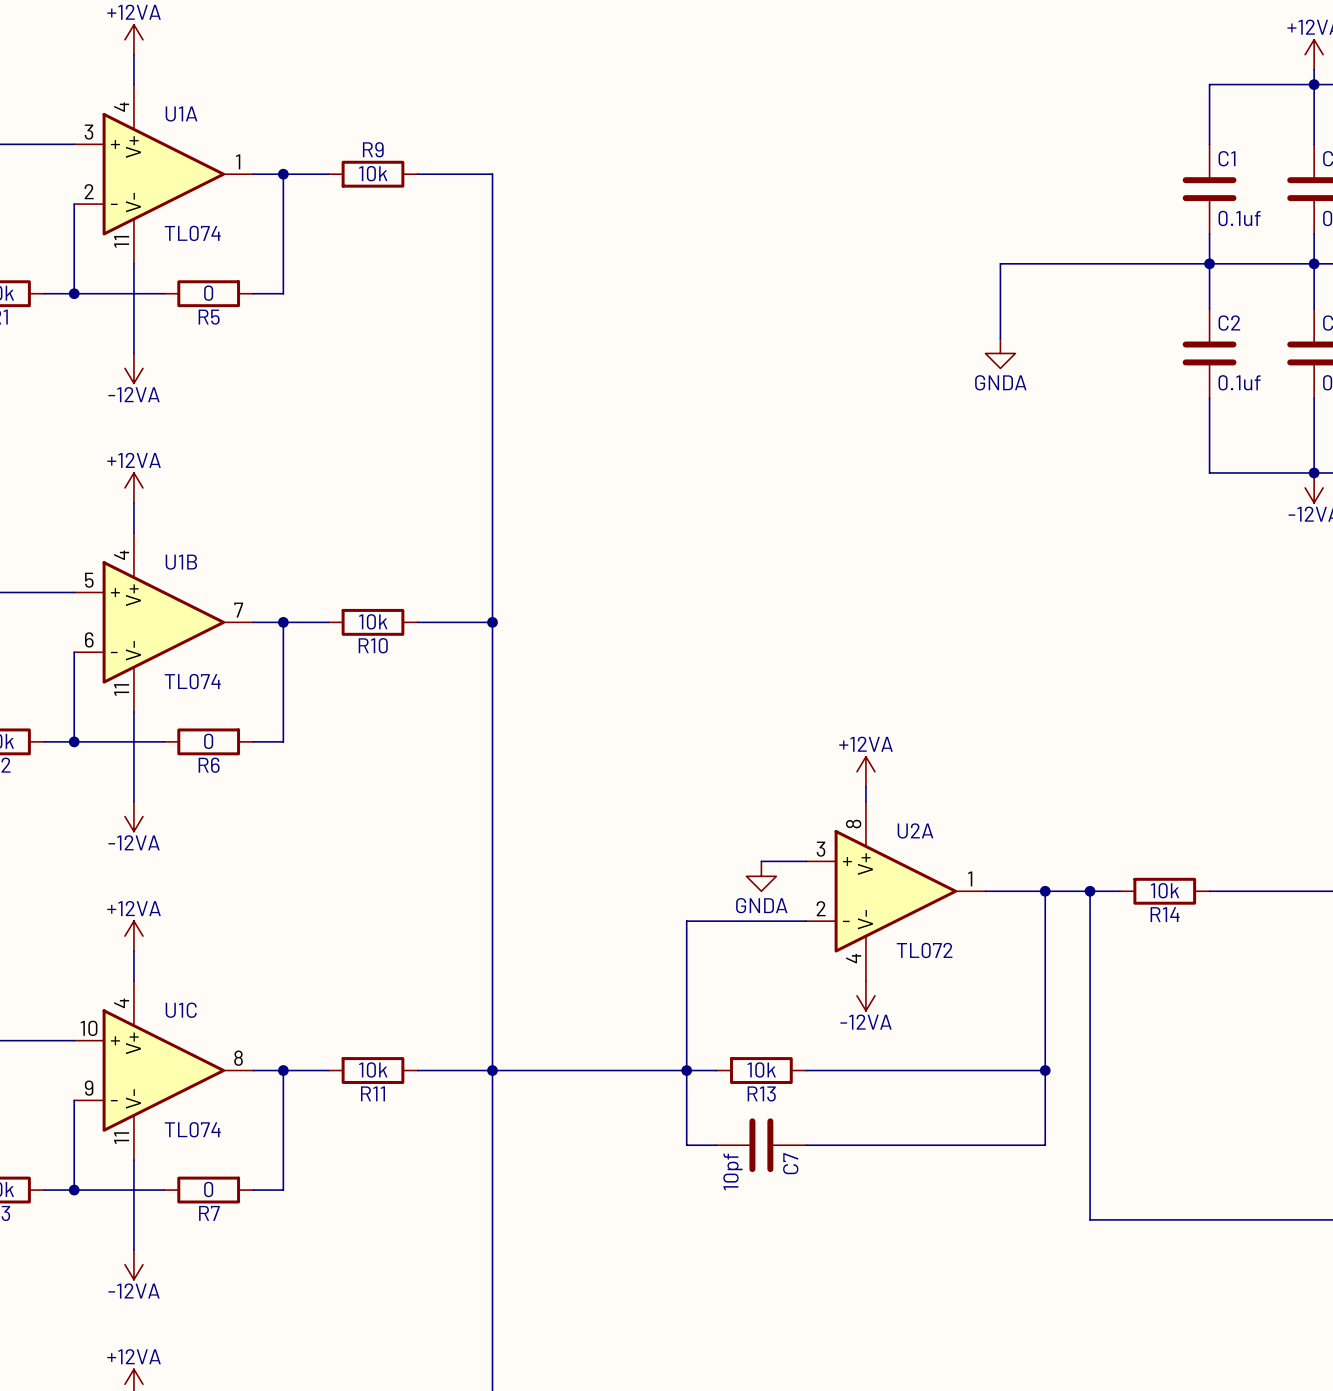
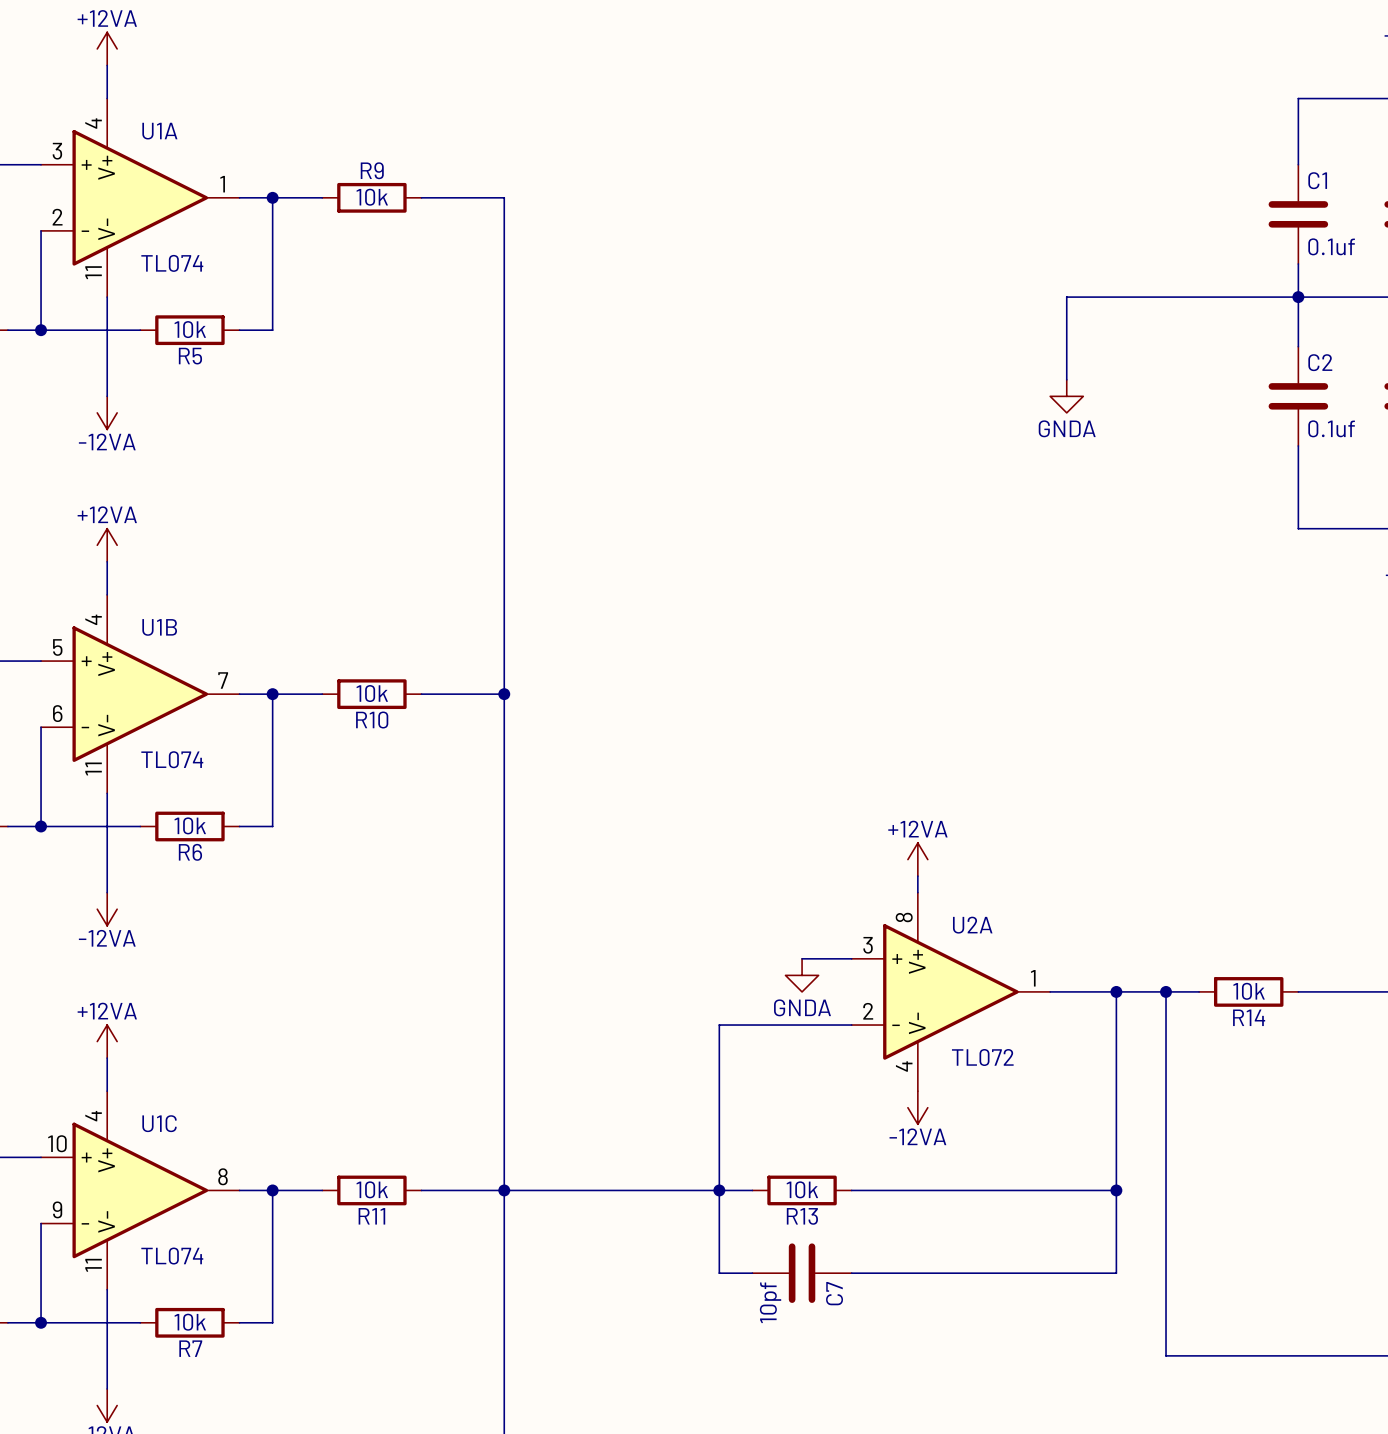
R5 value: 0 (208, 293) -> 10k (190, 329)
R6 value: 0 (208, 741) -> 10k (190, 825)
R7 value: 0 (208, 1189) -> 10k (190, 1322)

